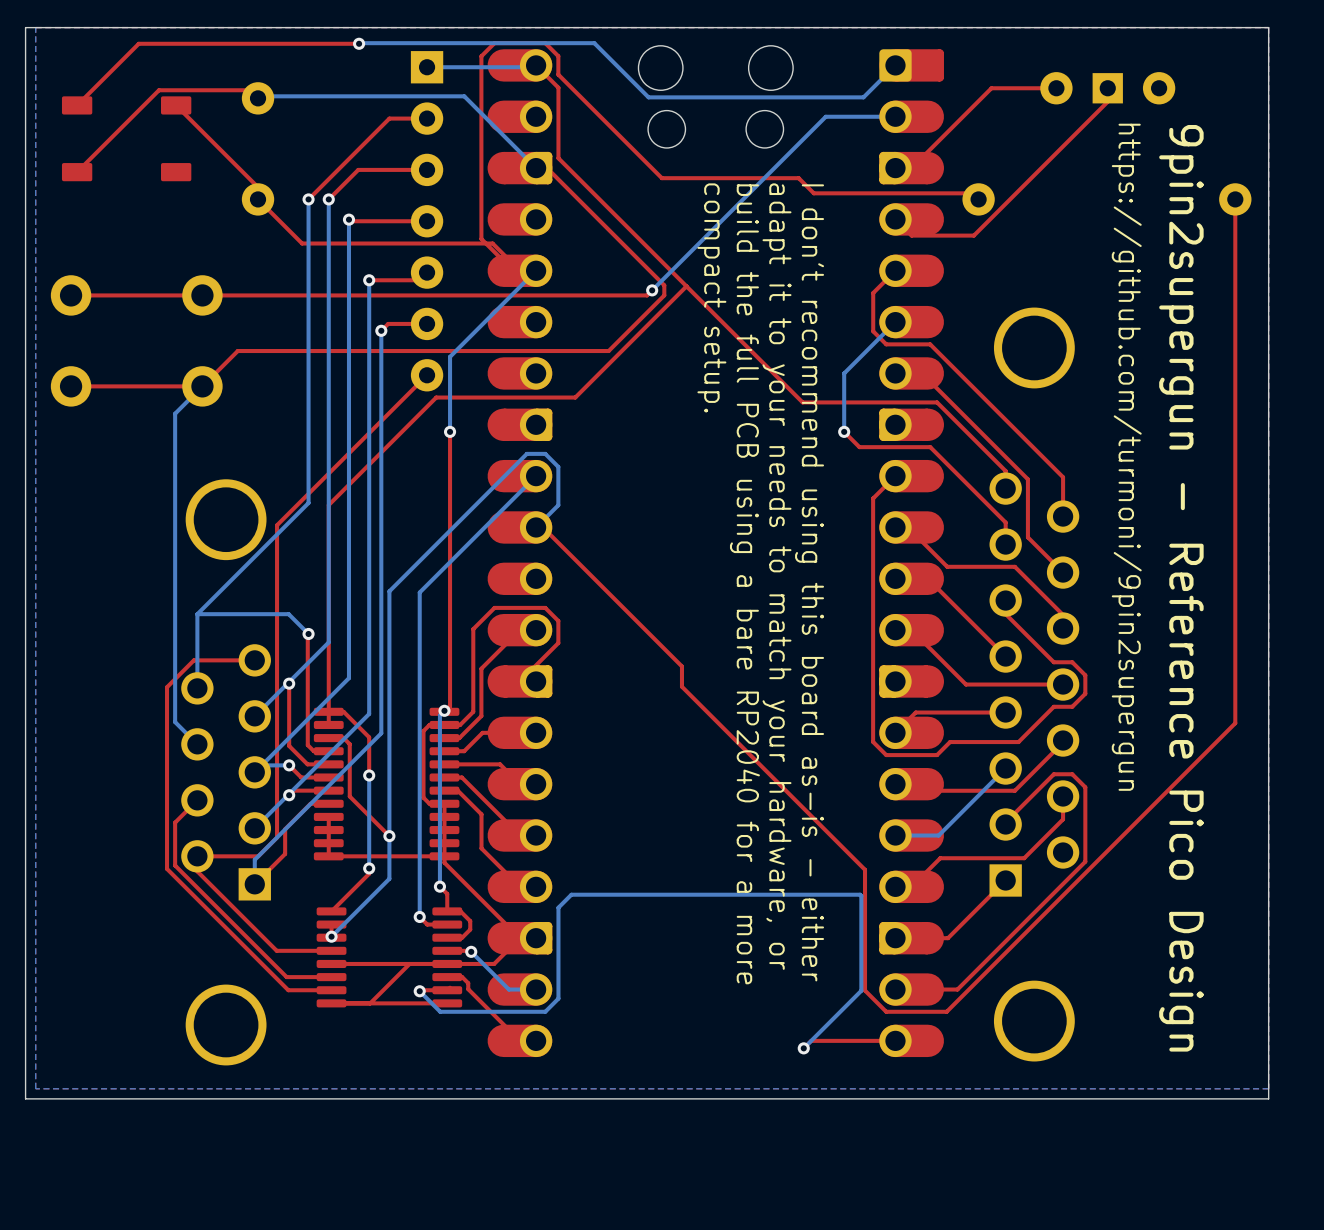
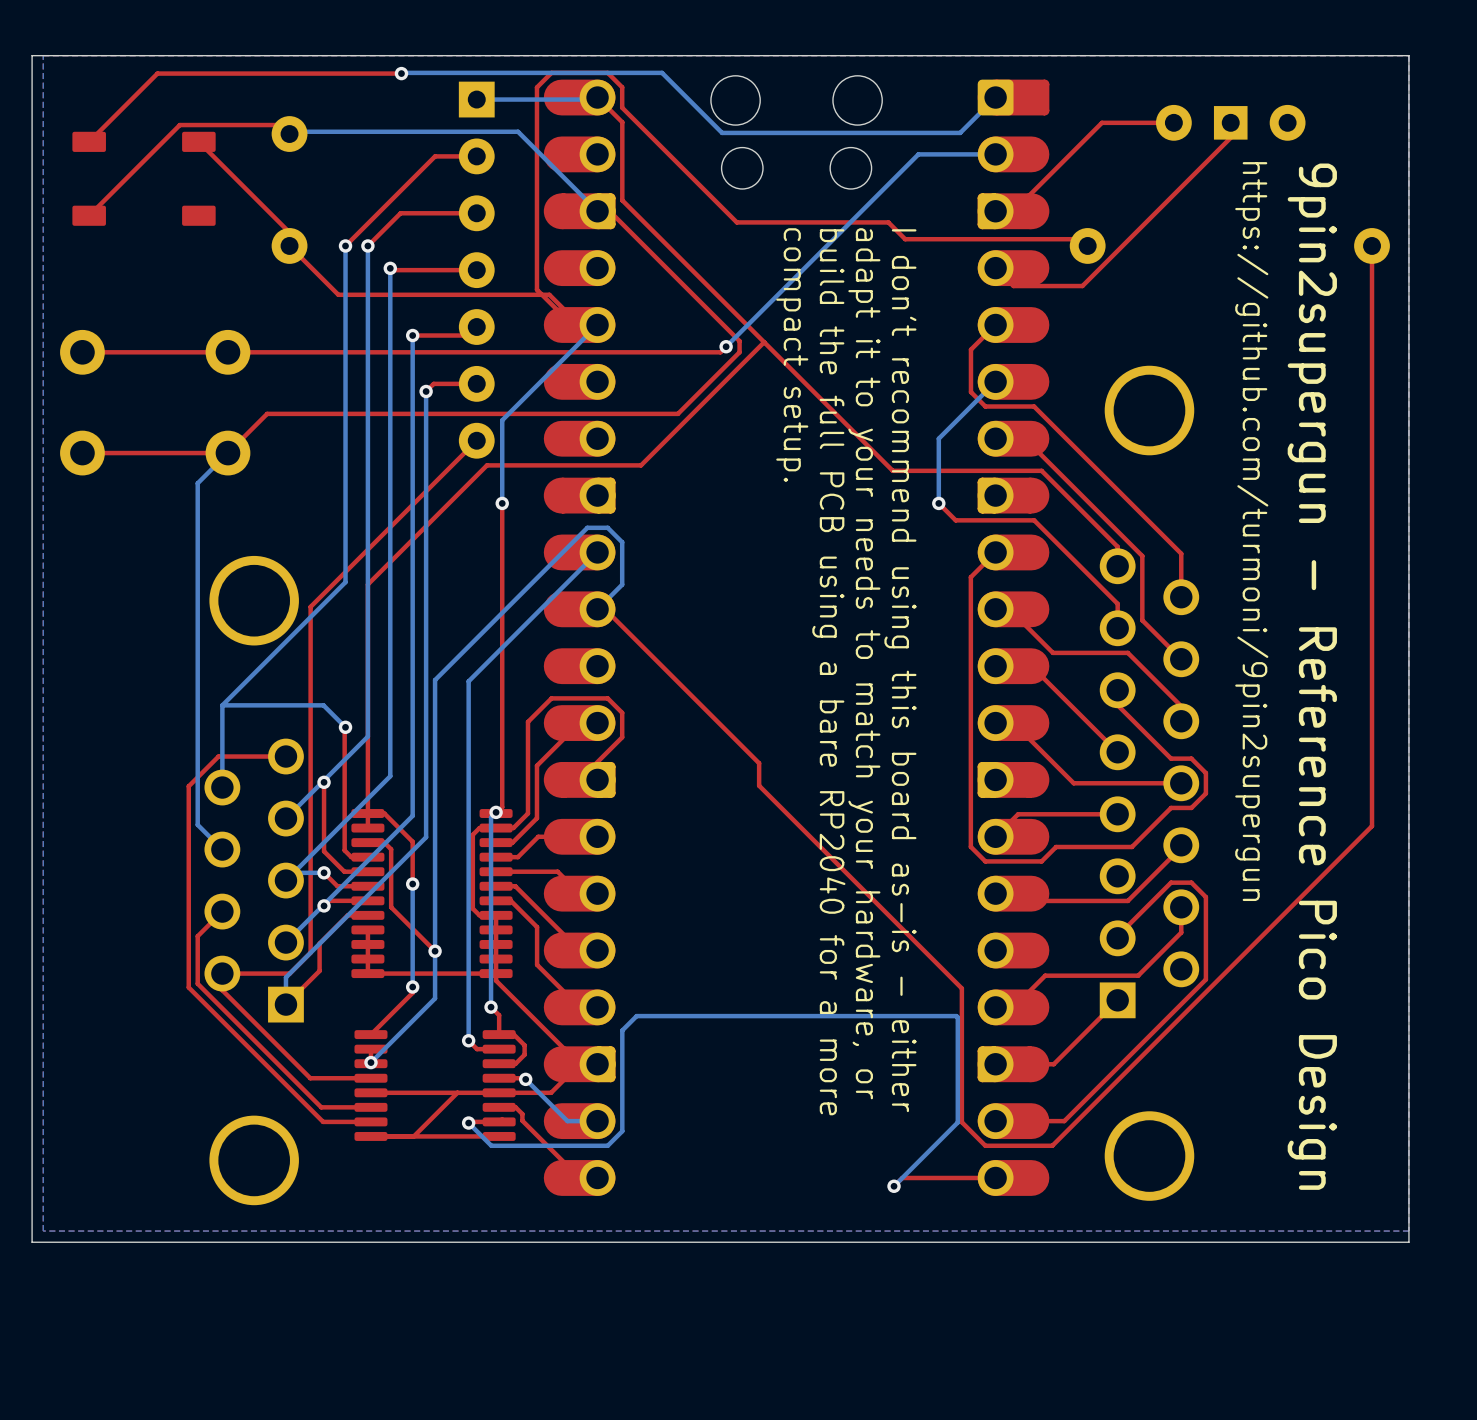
bottom track: (1005, 768) (938, 835) (895, 835) -> none

